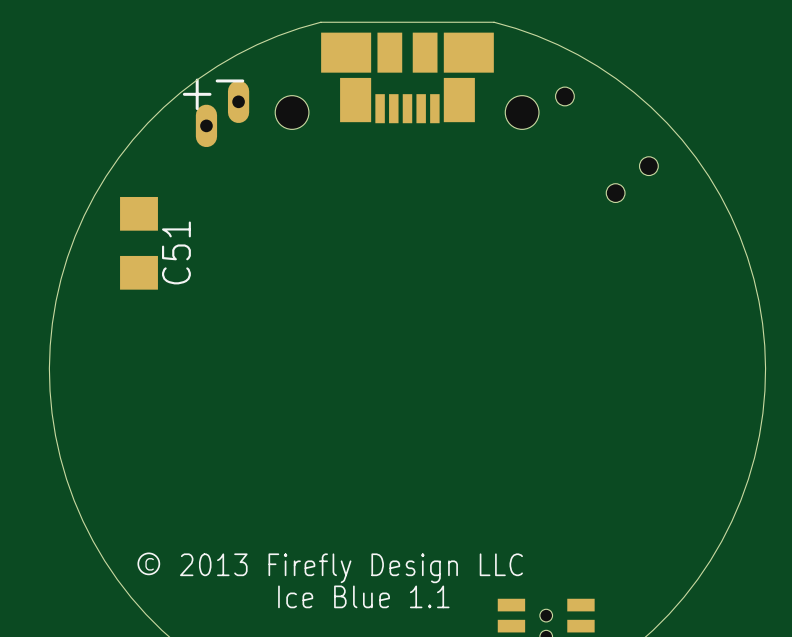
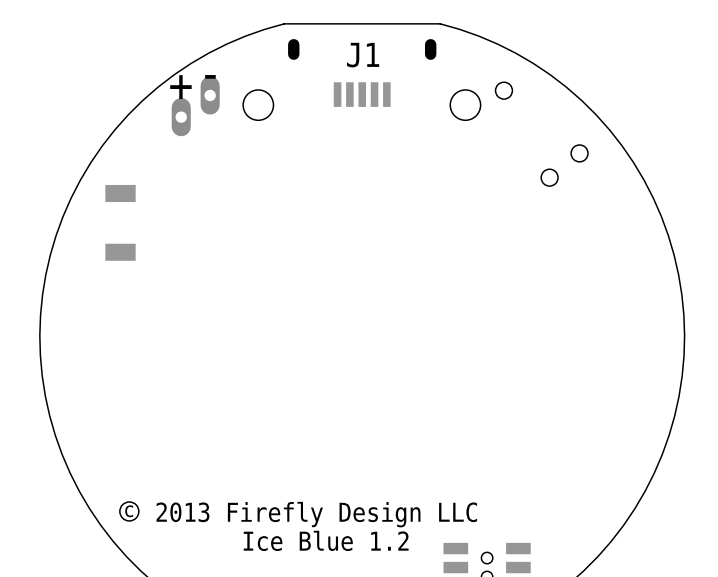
J1: none -> (362, 72)
part: (407, 77) -> none
C51: (139, 243) -> none
part: none -> (120, 222)
text: Ice Blue 1.1 (363, 596) -> Ice Blue 1.2 (326, 540)

